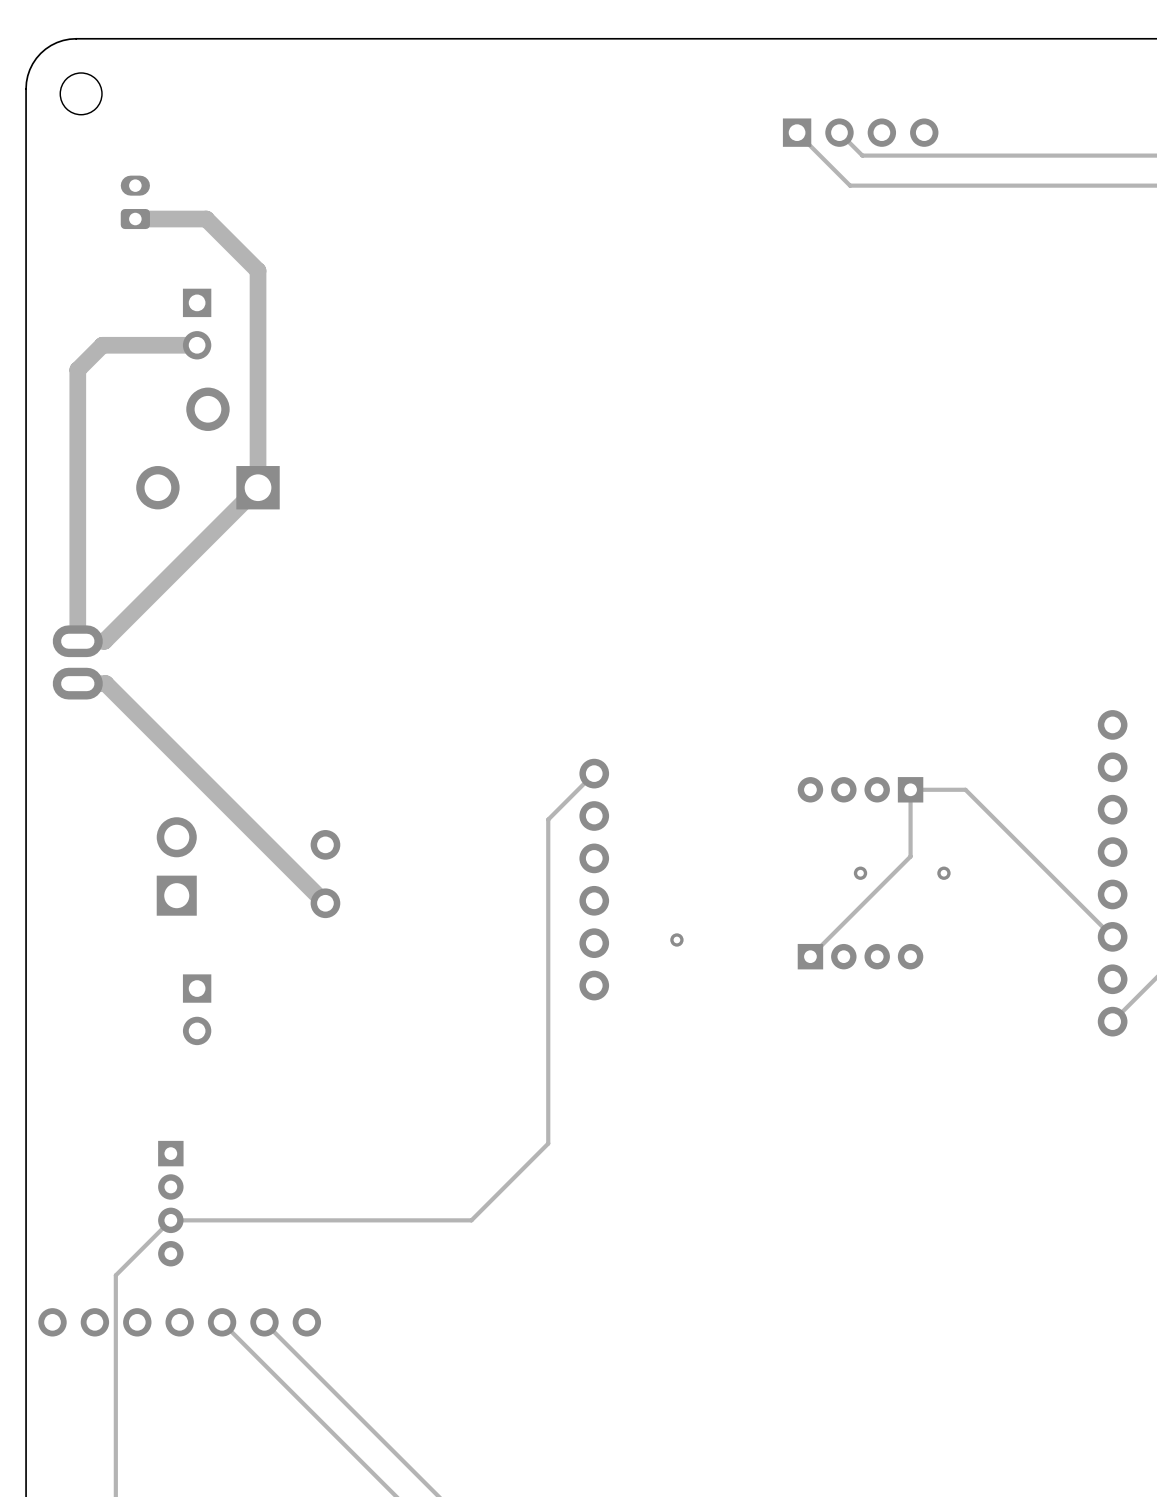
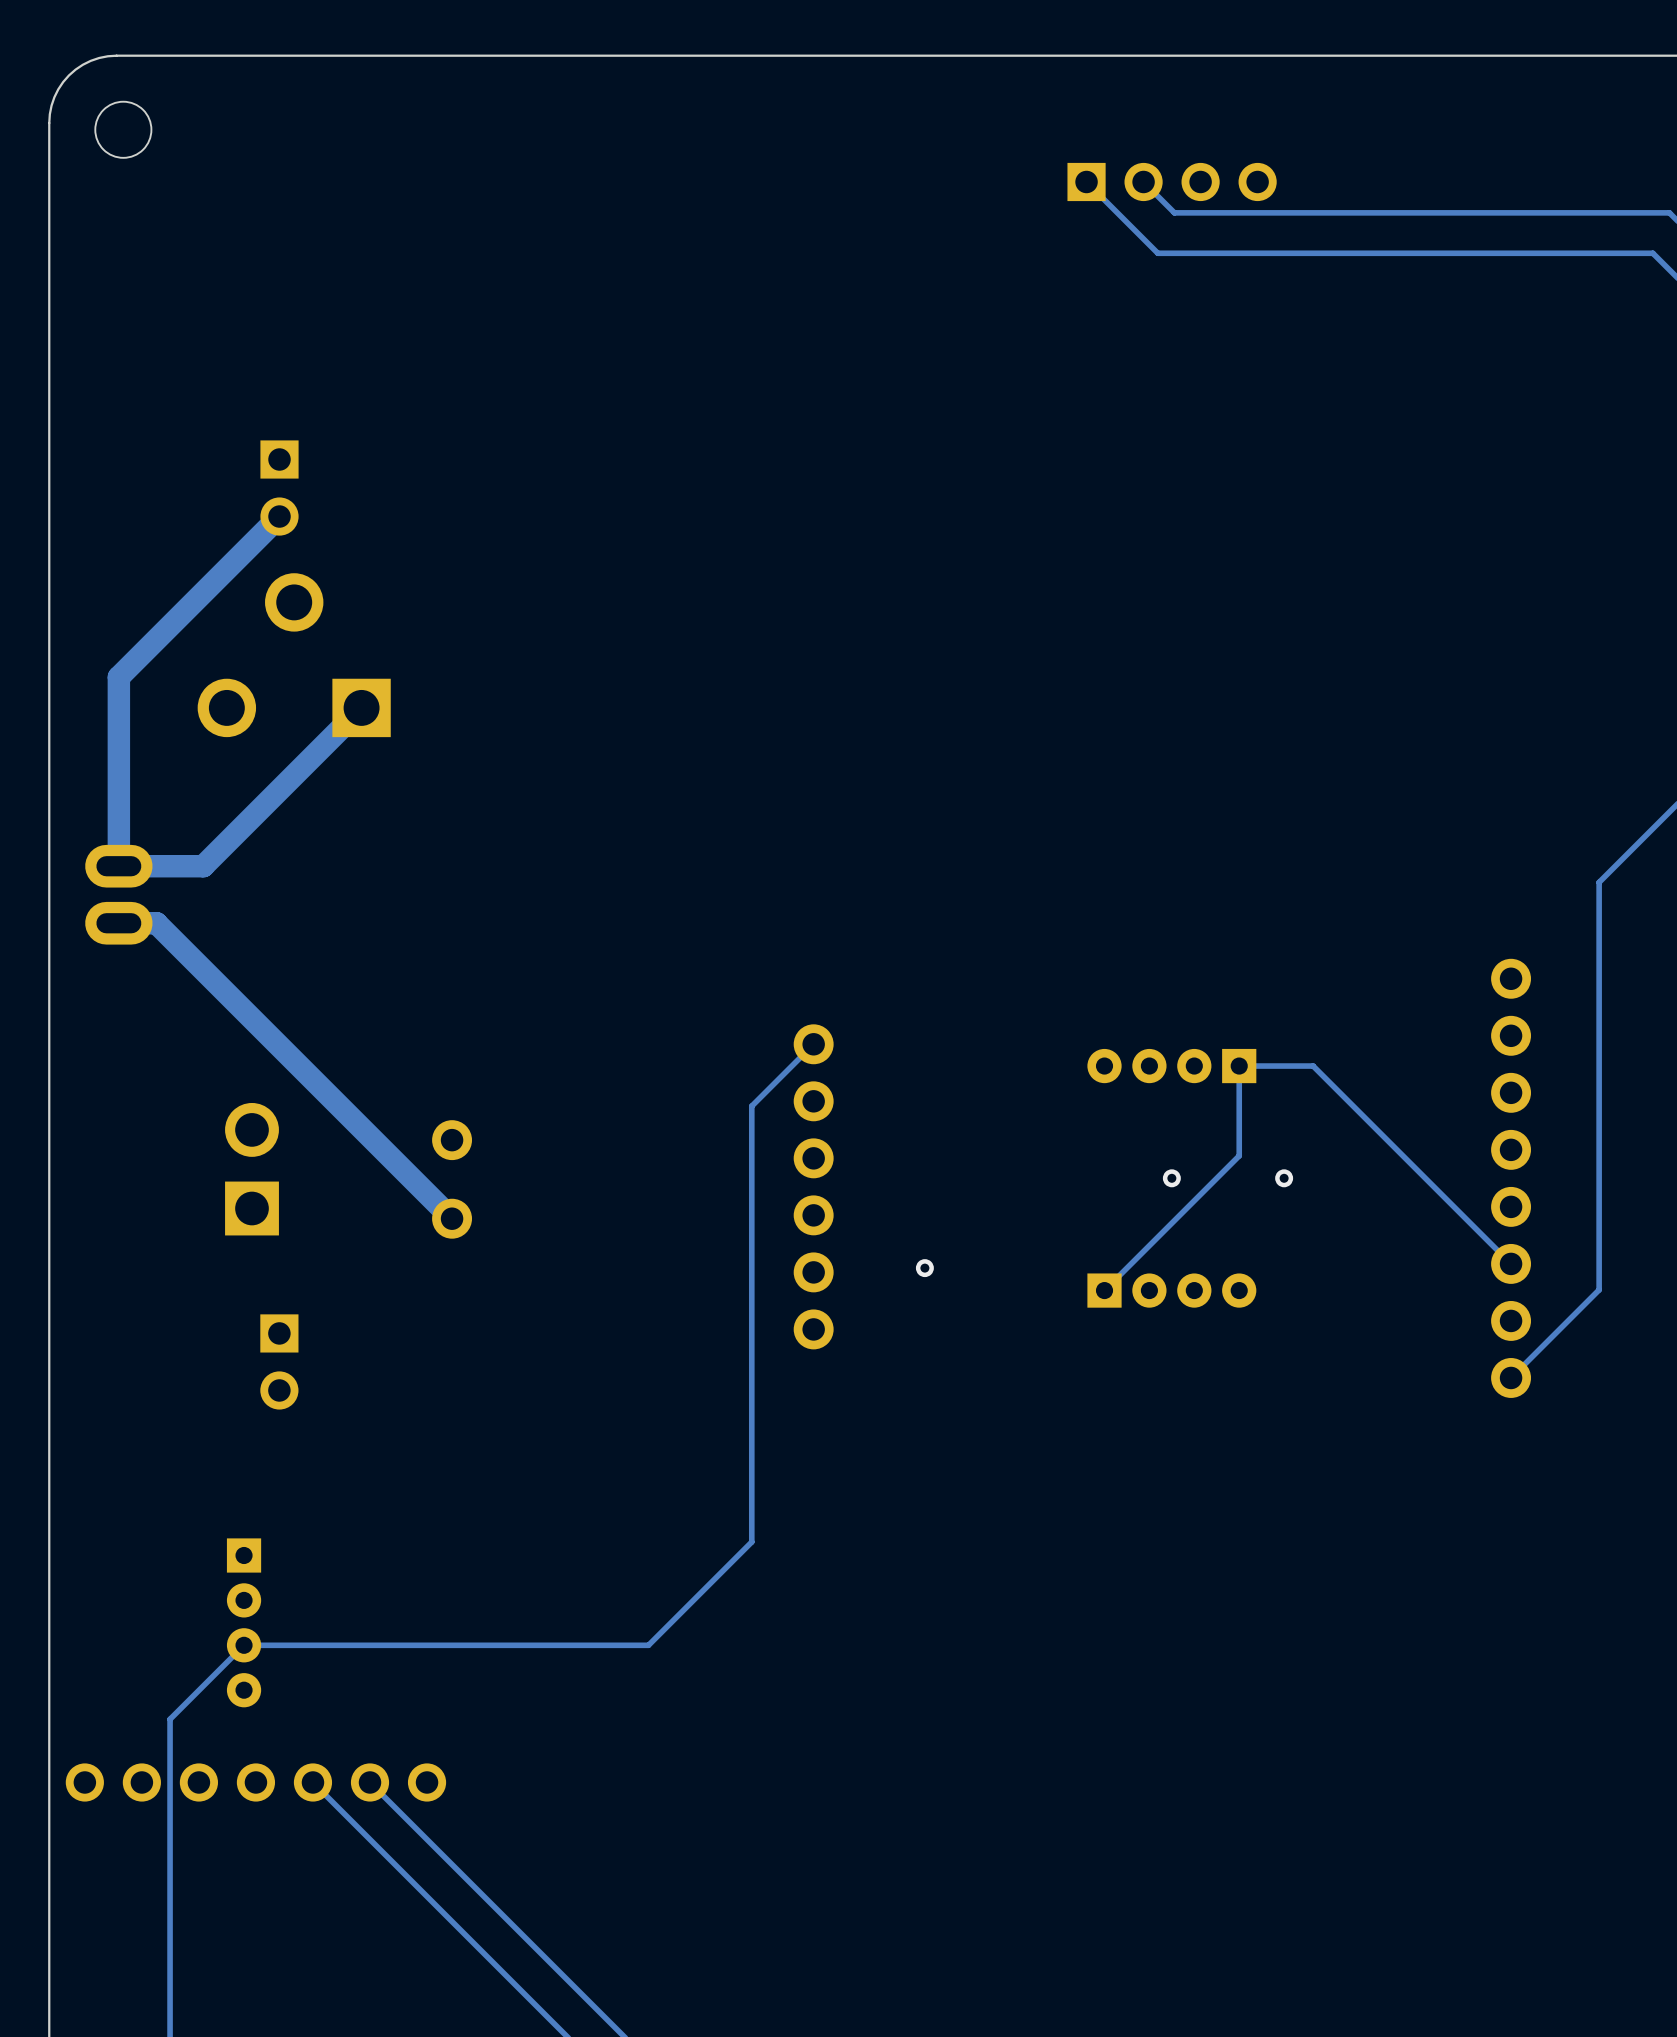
part: (135, 202) -> none
track: (135, 219) (206, 219) (258, 270) (258, 487) (104, 641) -> (361, 707) (203, 866) (154, 866)
part position: (197, 324) -> (279, 488)
track: (197, 345) (102, 345) (77, 369) (77, 500) -> (279, 516) (118, 677)
part position: (207, 448) -> (294, 655)

